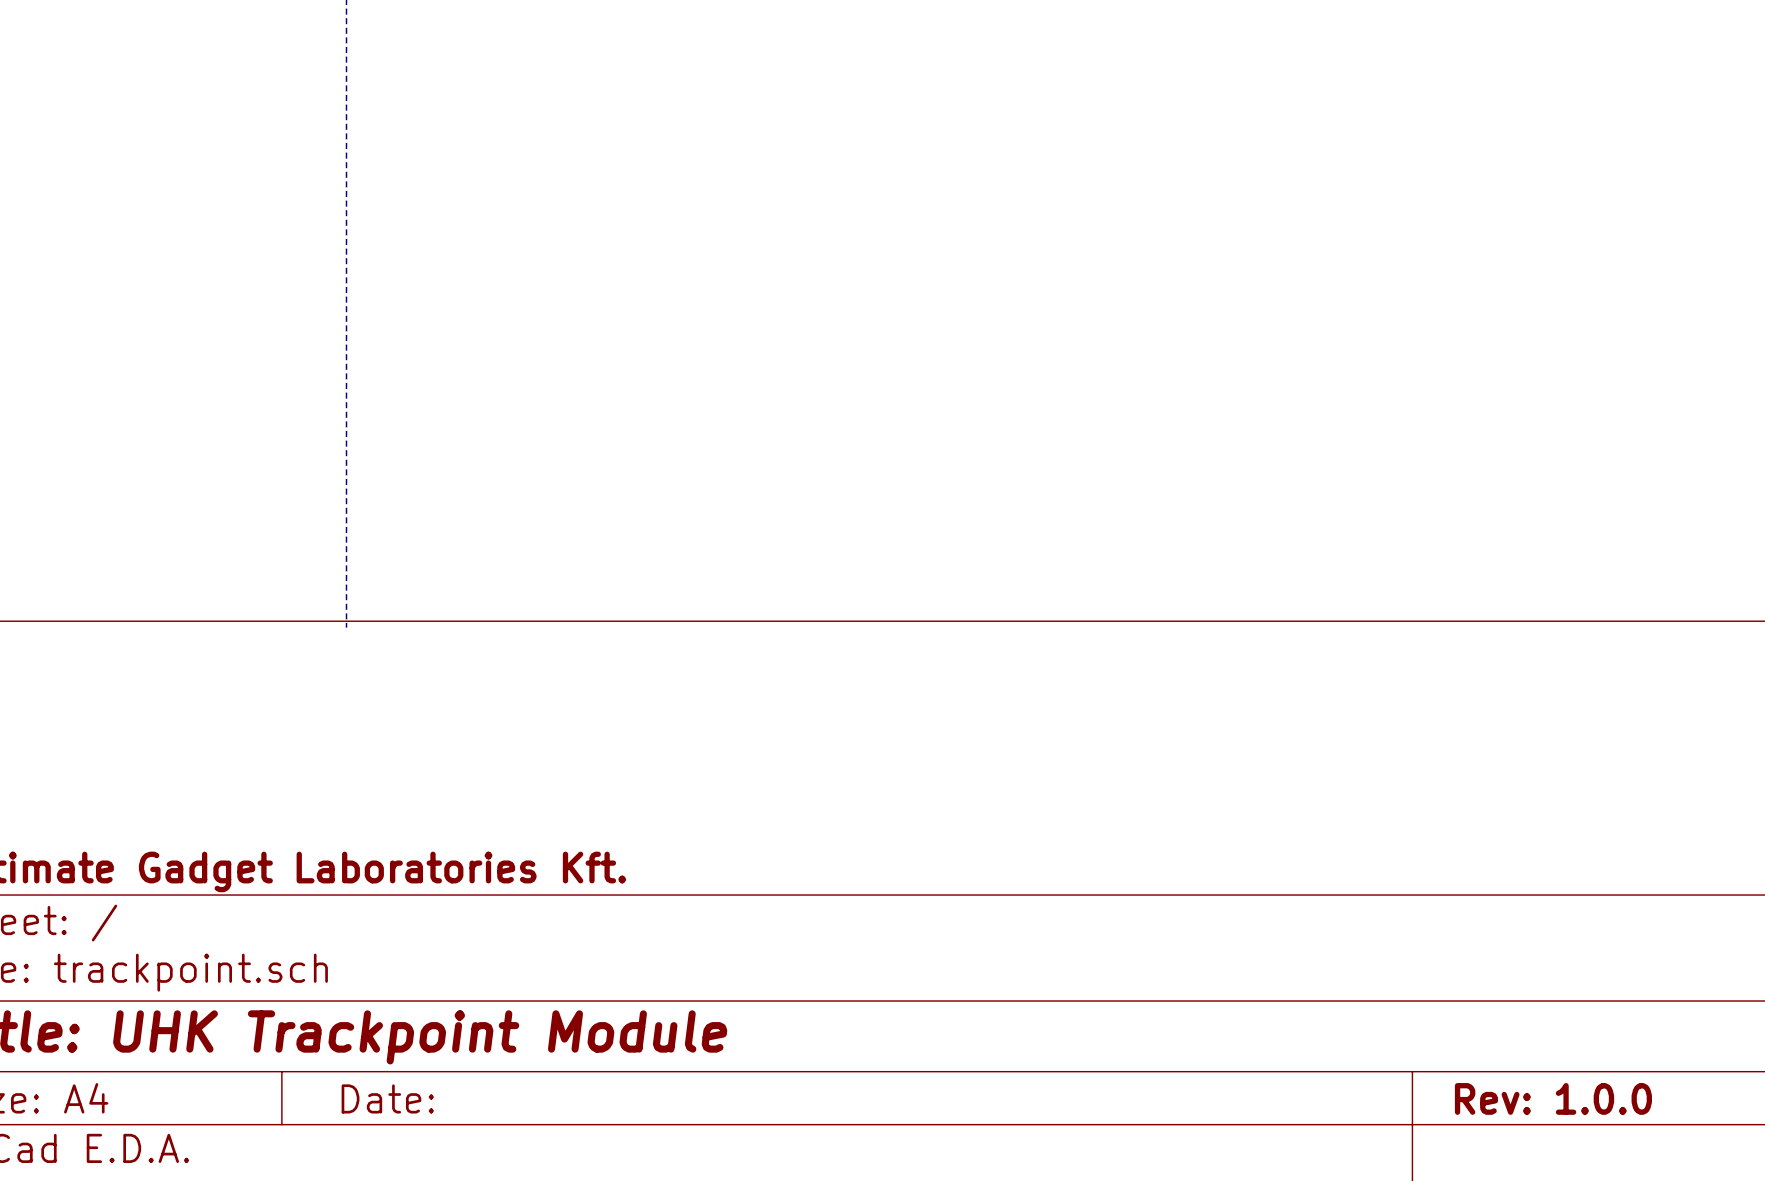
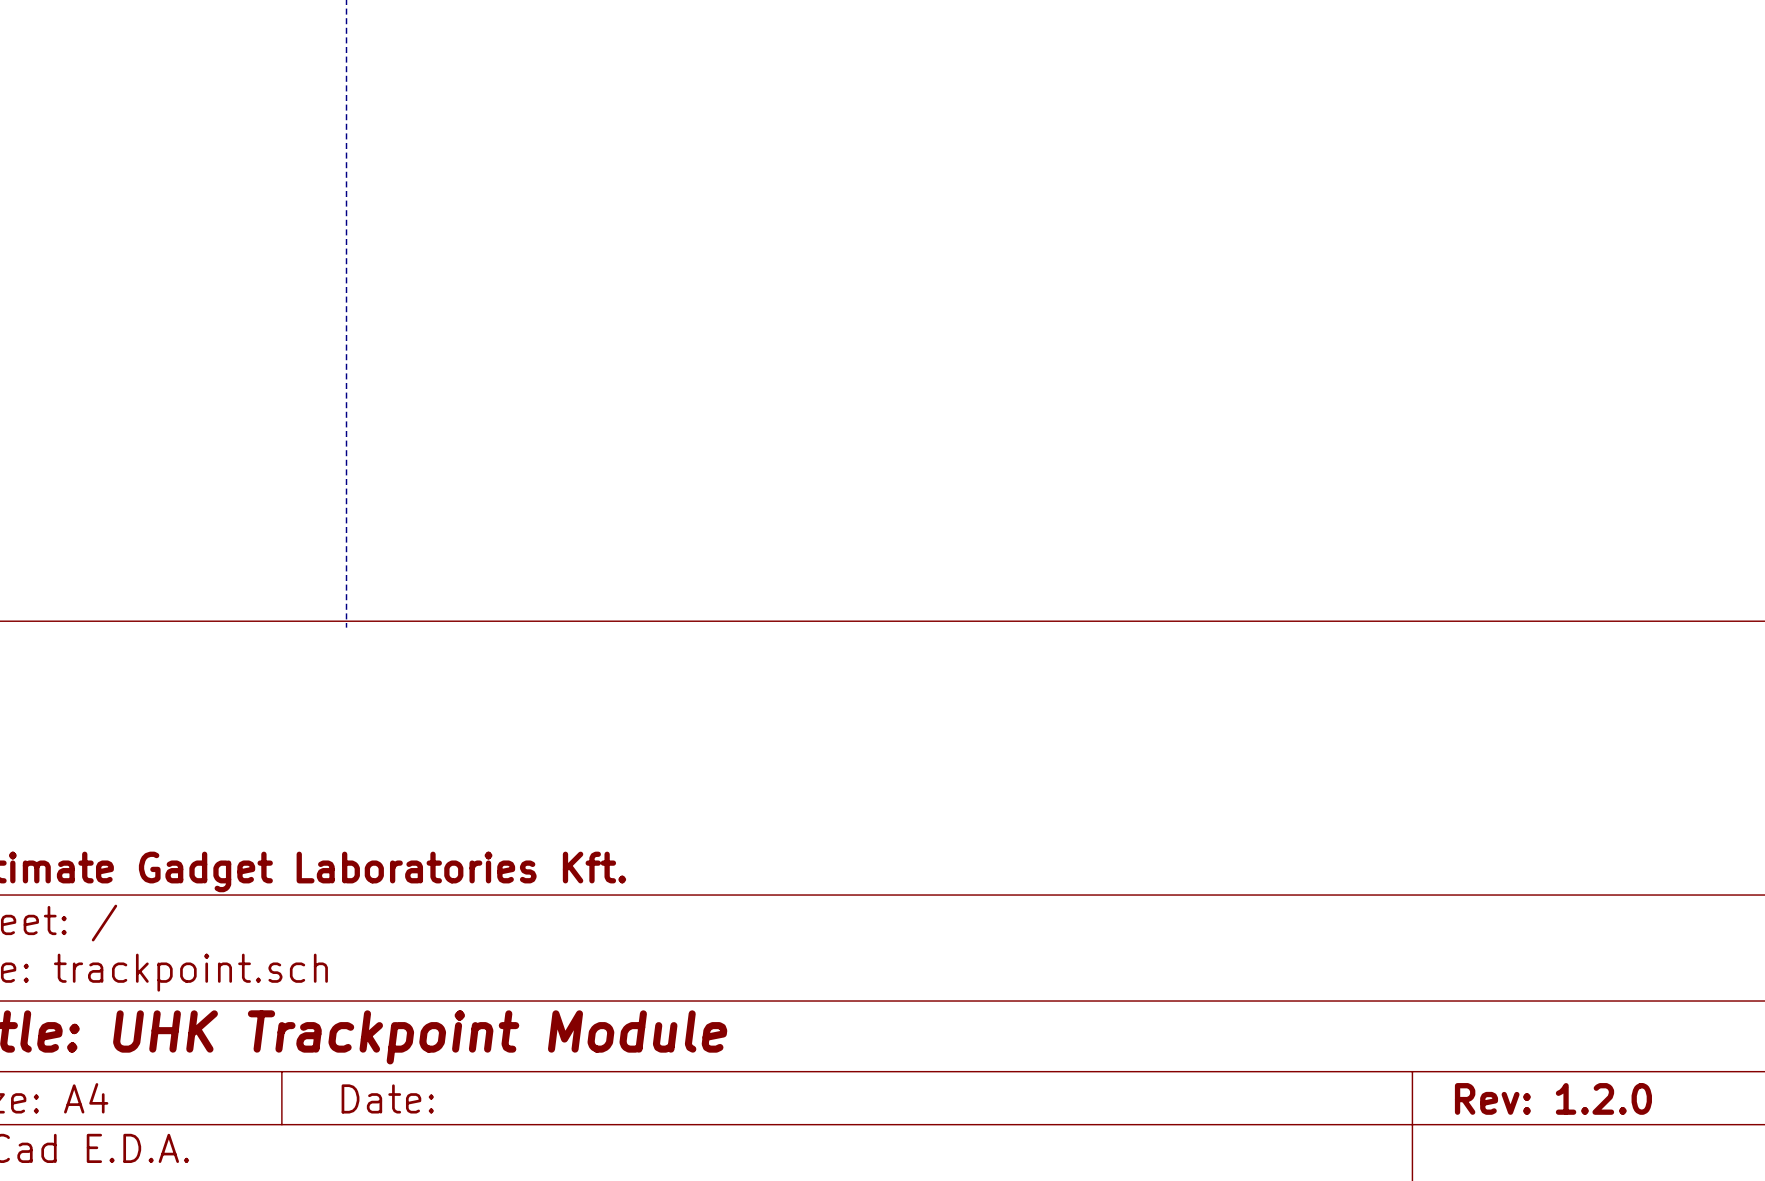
title block: Rev: 1.0.0 (1553, 1098) -> Rev: 1.2.0 (1553, 1098)

